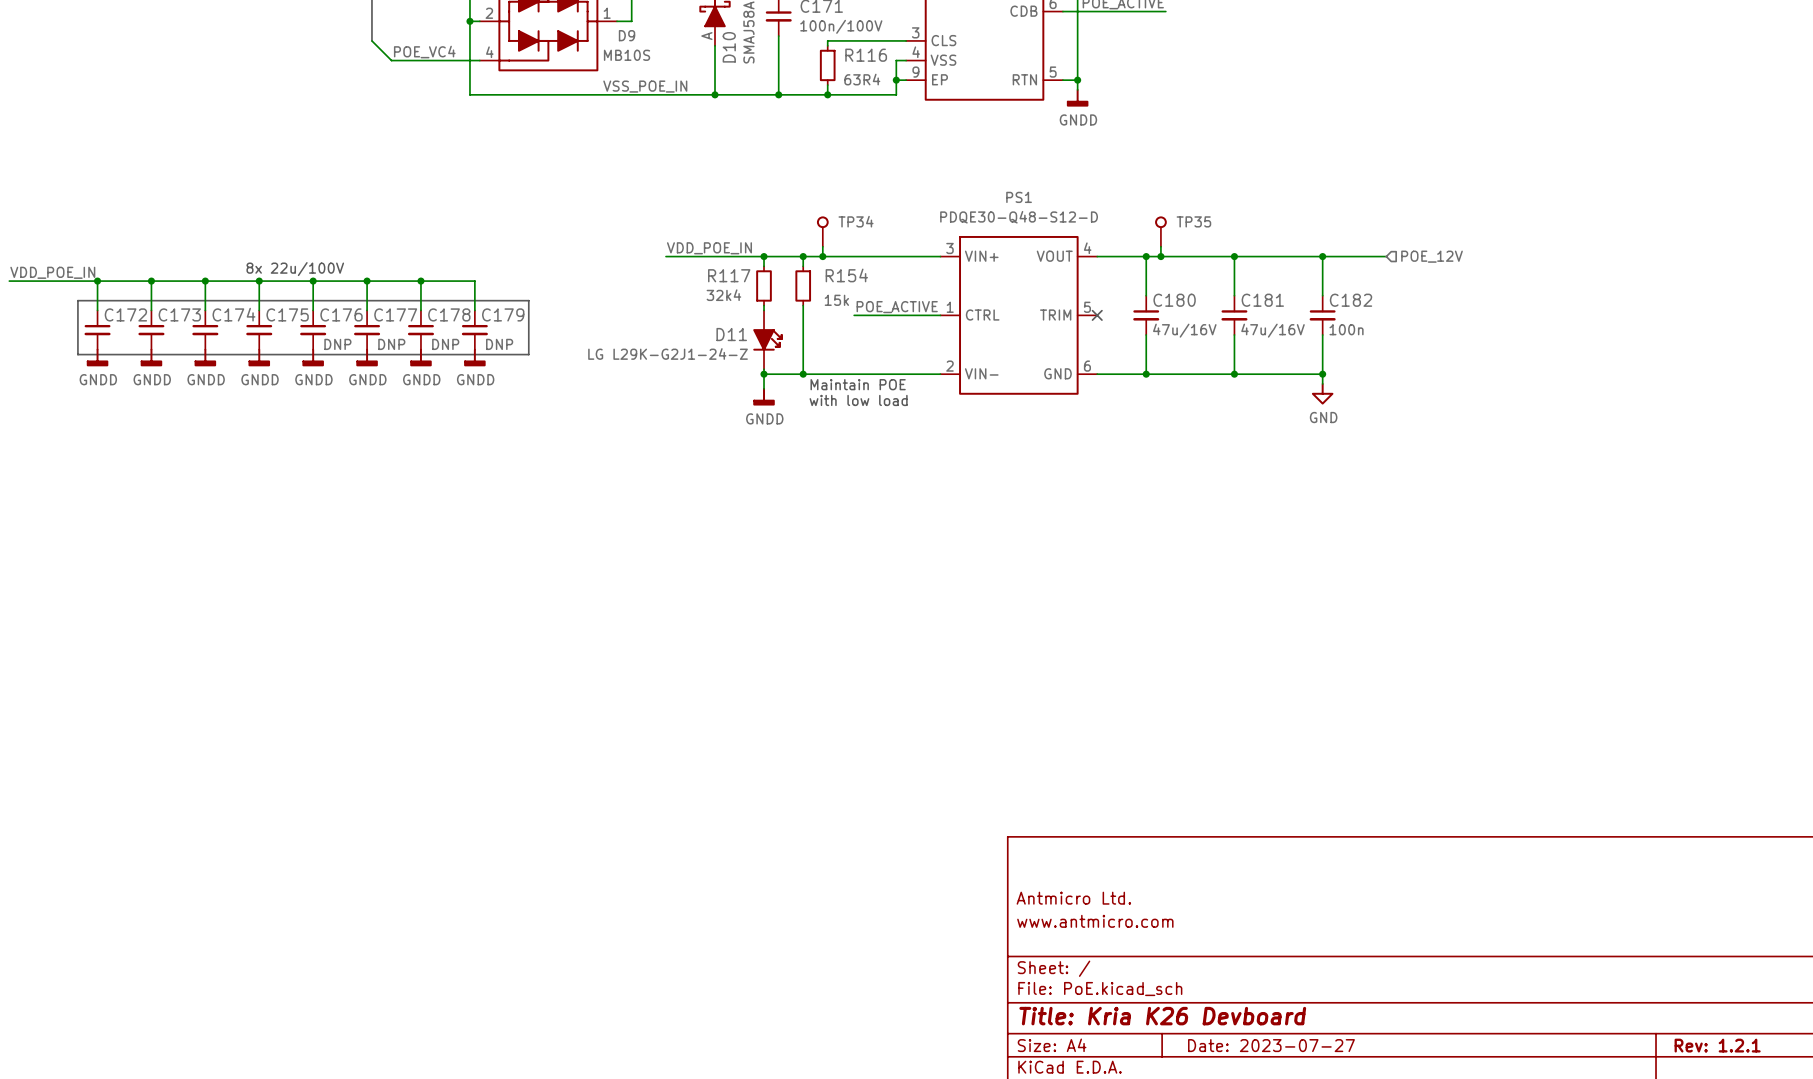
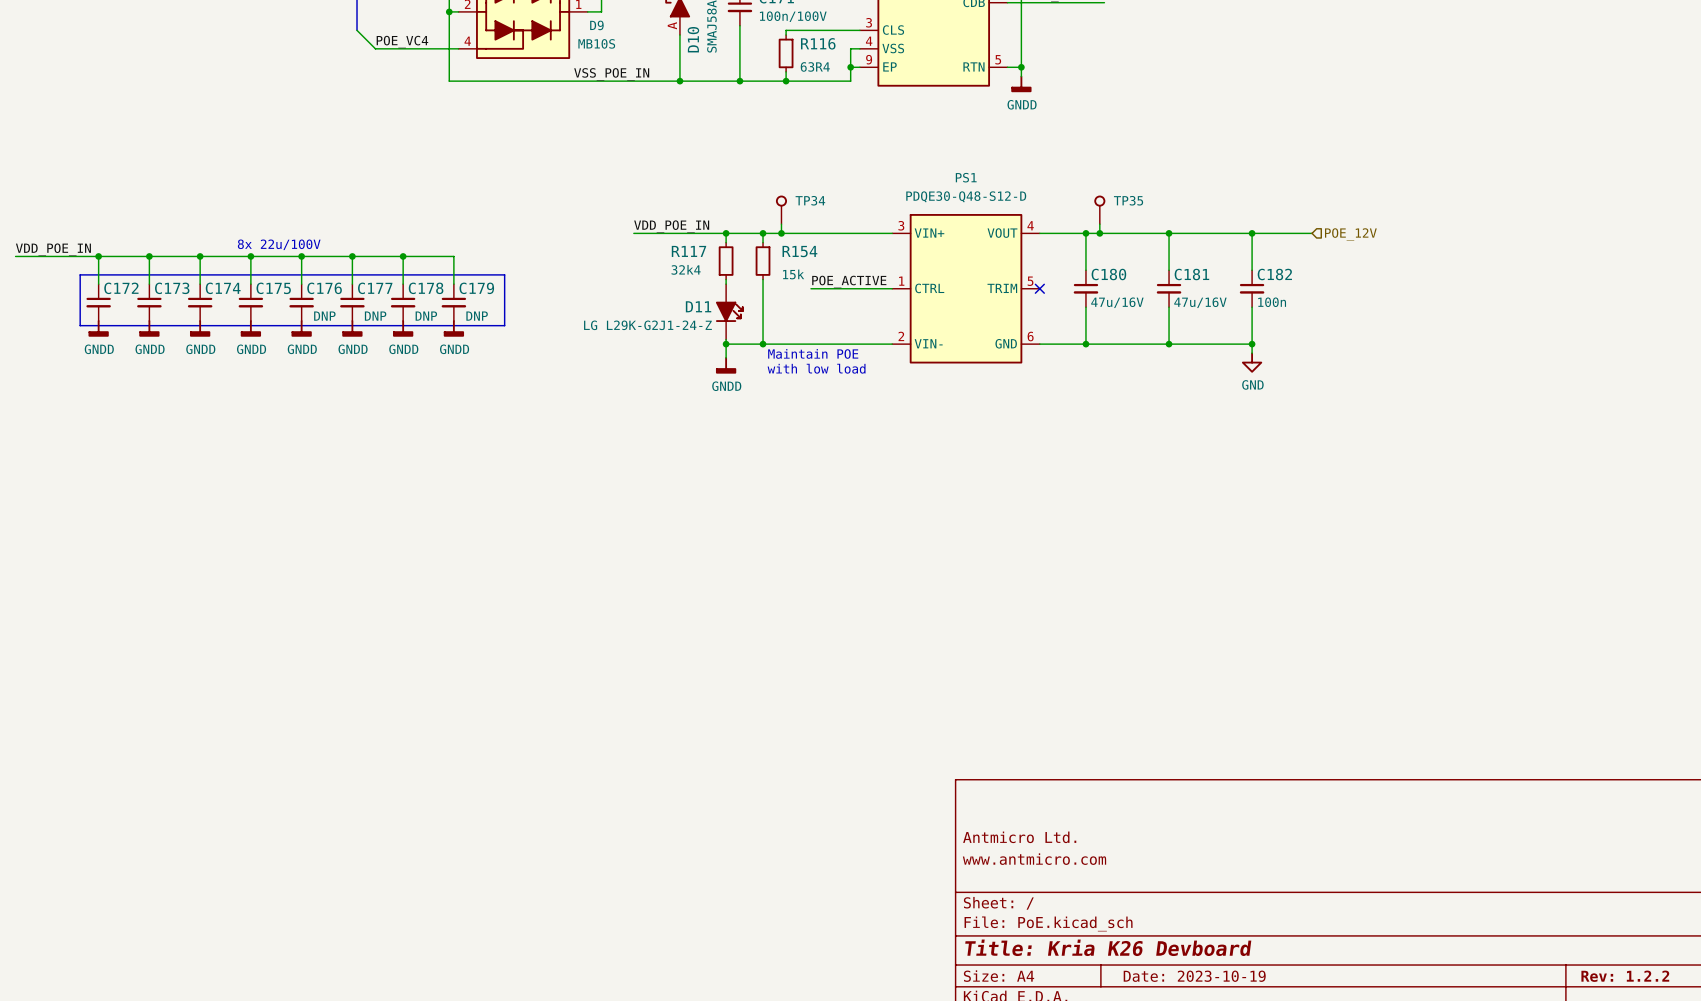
title block: Date: 2023-07-27 (1271, 1045) -> Date: 2023-10-19 (1194, 976)
title block: Rev: 1.2.1 (1717, 1045) -> Rev: 1.2.2 (1625, 976)

